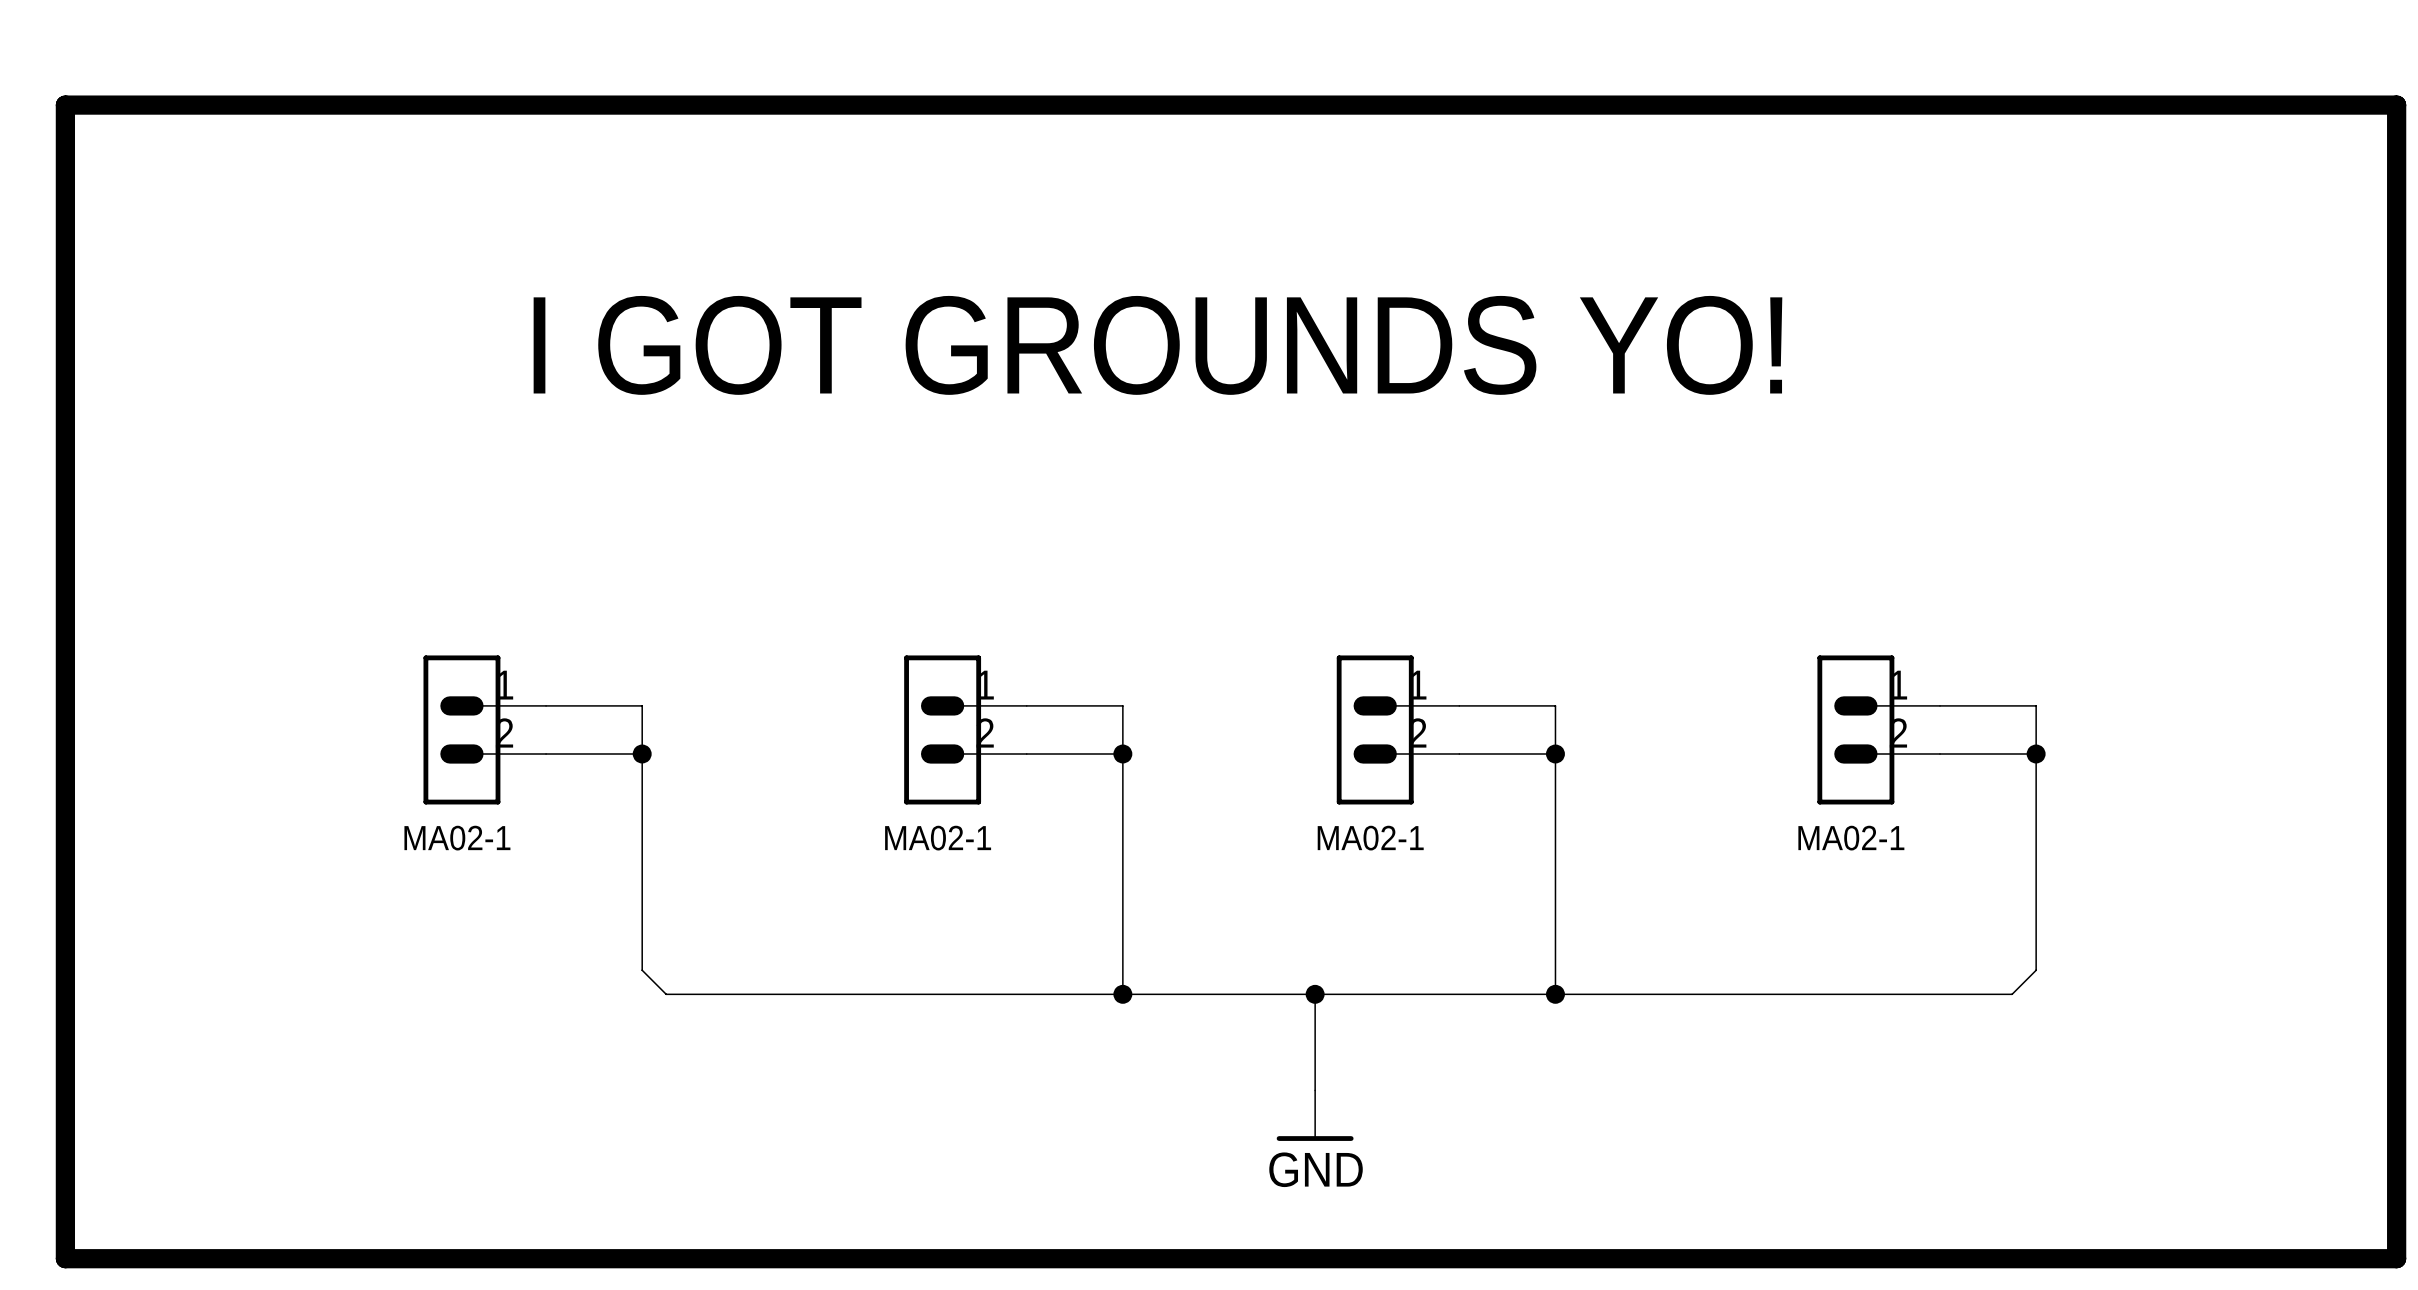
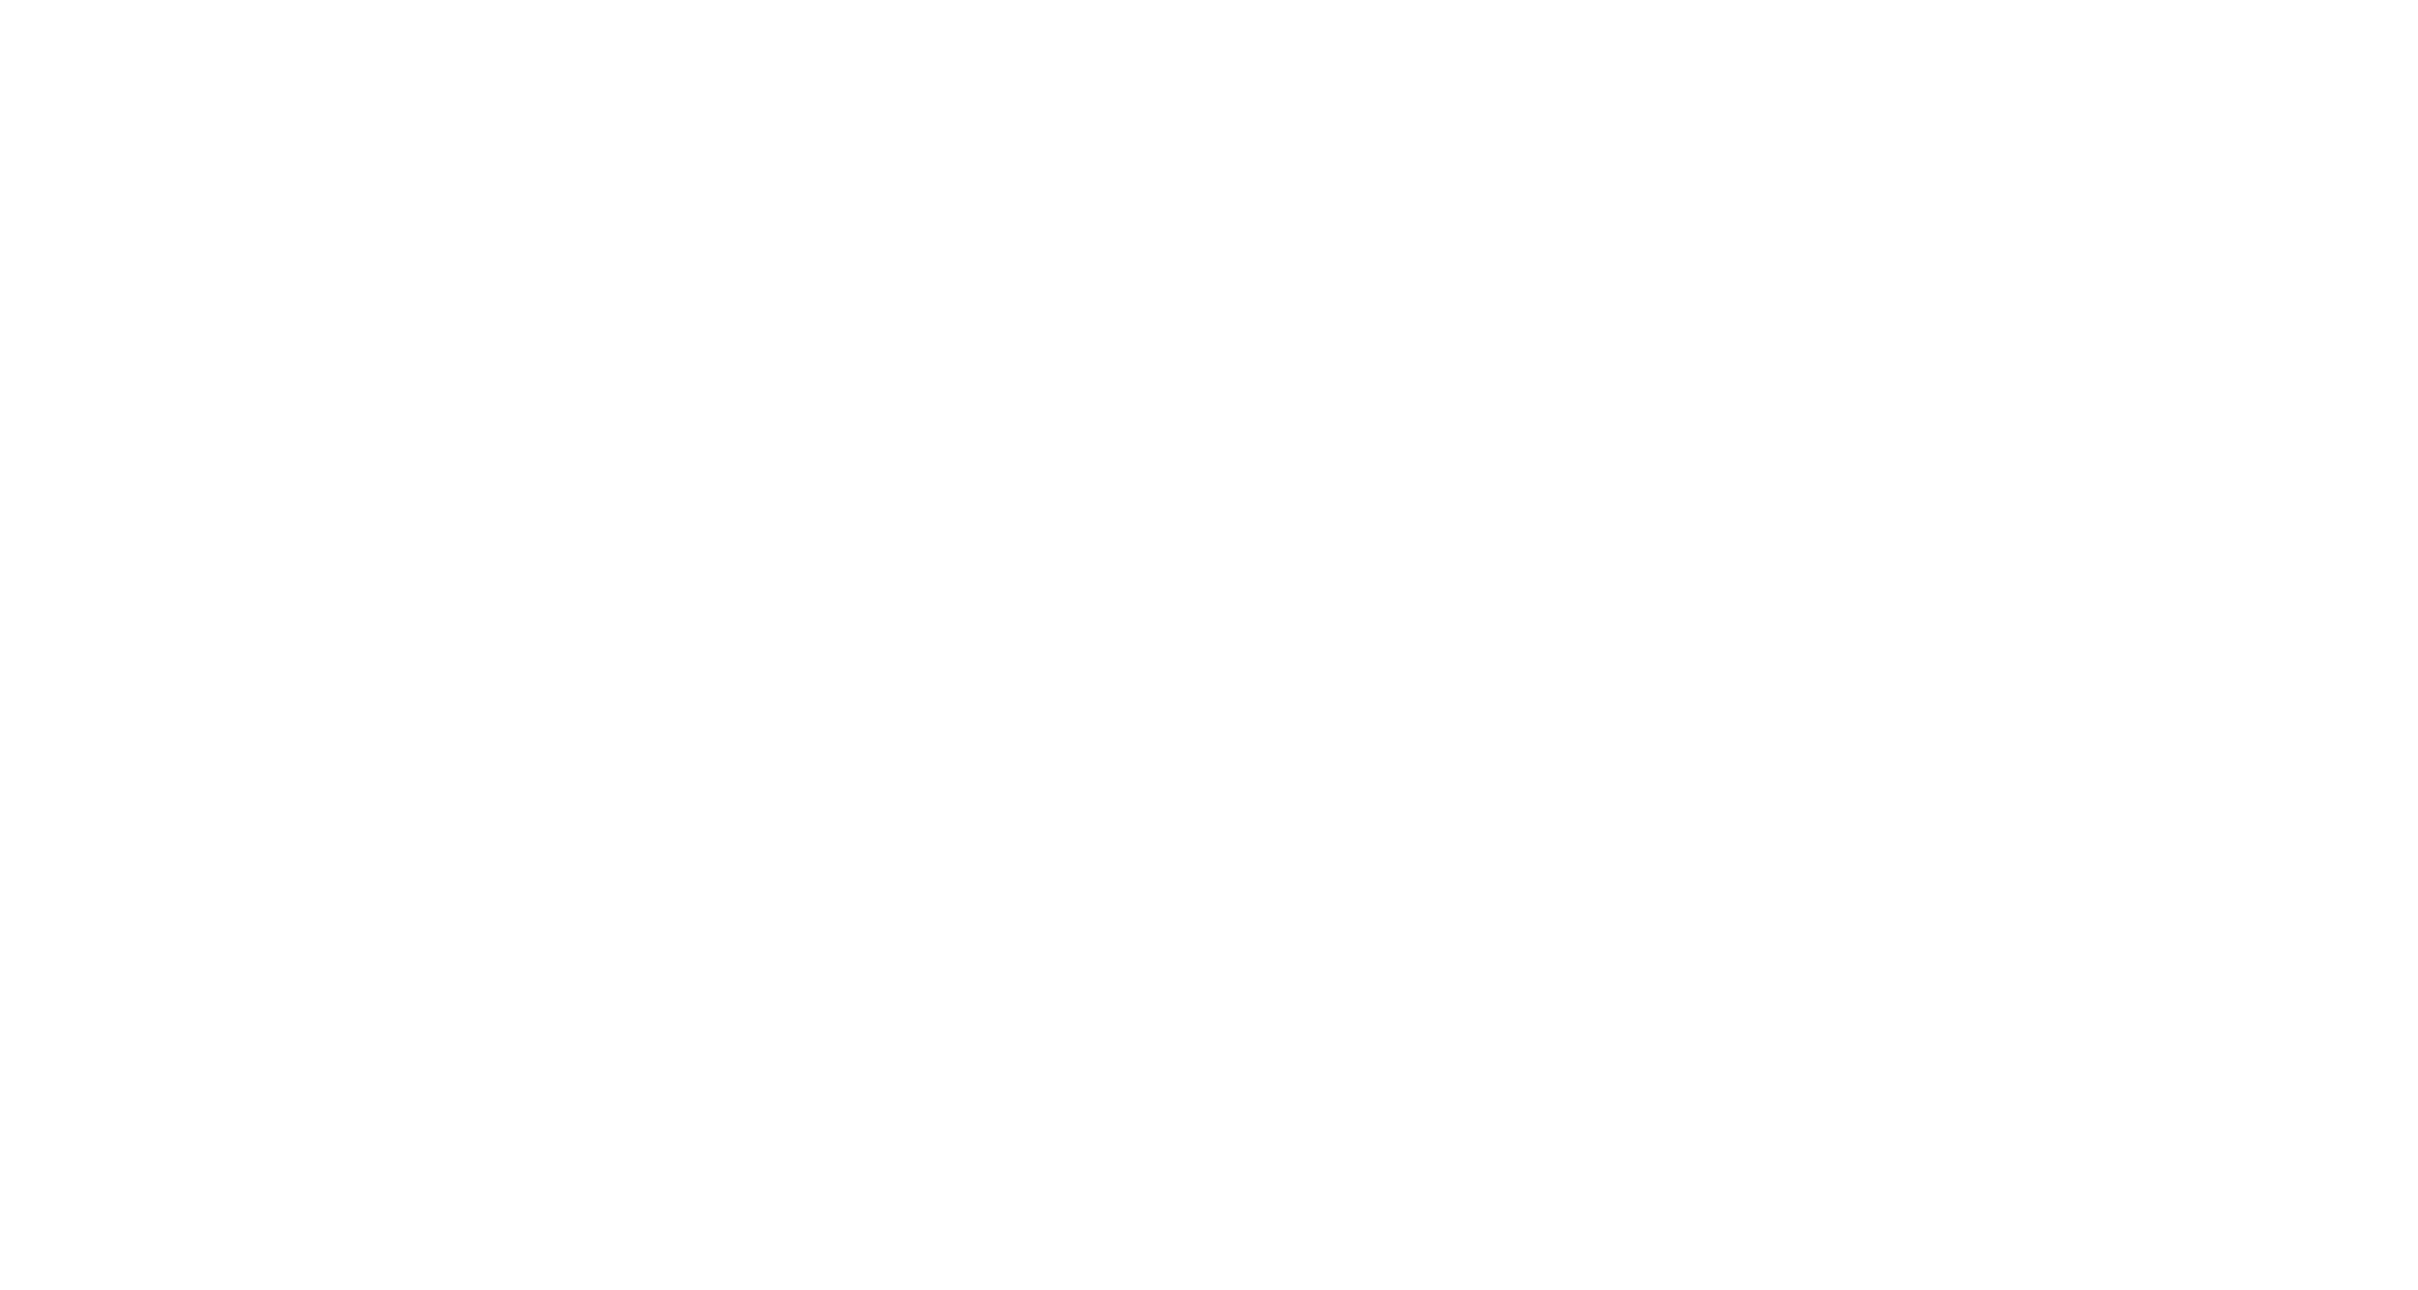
line: (65, 105) (2396, 105) (2396, 1258) (65, 1258) (65, 105) -> none
text: I GOT GROUNDS YO! (1157, 345) -> none
wire: (546, 705) (642, 705) (642, 970) (666, 994) (2012, 994) (2036, 970) (2036, 705) (1940, 705) -> none
wire: (1026, 705) (1122, 705) (1122, 994) -> none
wire: (1459, 705) (1555, 705) (1555, 994) -> none
part: MA02-1 (484, 729) -> none
part: MA02-1 (965, 729) -> none
part: MA02-1 (1398, 729) -> none
part: MA02-1 (1878, 729) -> none
wire: (546, 753) (642, 753) -> none
junction: (642, 753) -> none
wire: (1026, 753) (1122, 753) -> none
junction: (1122, 753) -> none
wire: (1459, 753) (1555, 753) -> none
junction: (1555, 753) -> none
wire: (1940, 753) (2036, 753) -> none
junction: (2036, 753) -> none
junction: (1122, 994) -> none
wire: (1315, 994) (1315, 1090) -> none
junction: (1315, 994) -> none
junction: (1555, 994) -> none
power symbol: GND (1315, 1115) -> none

